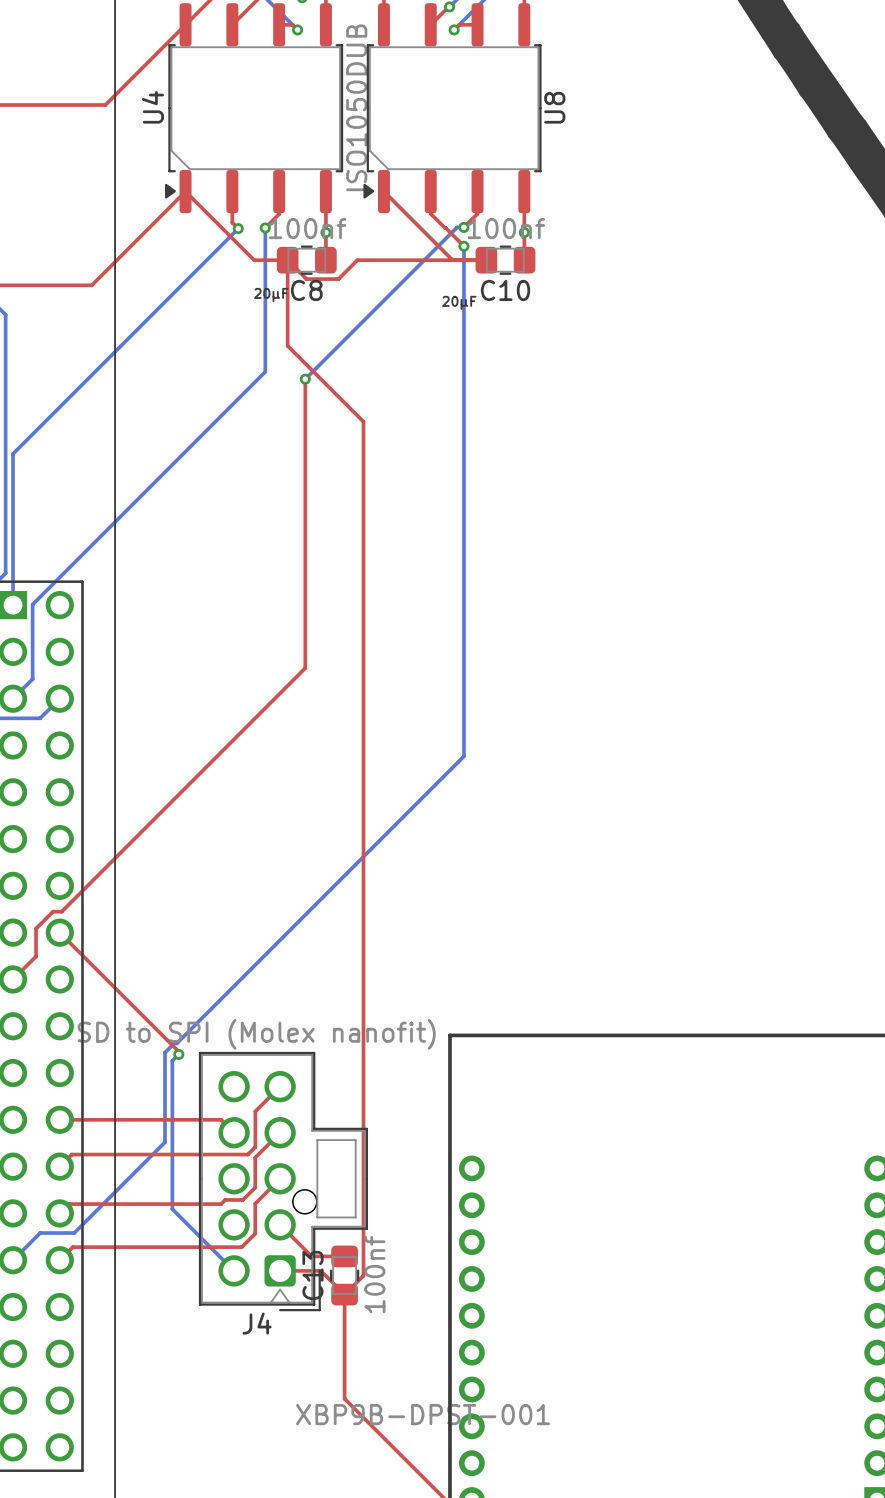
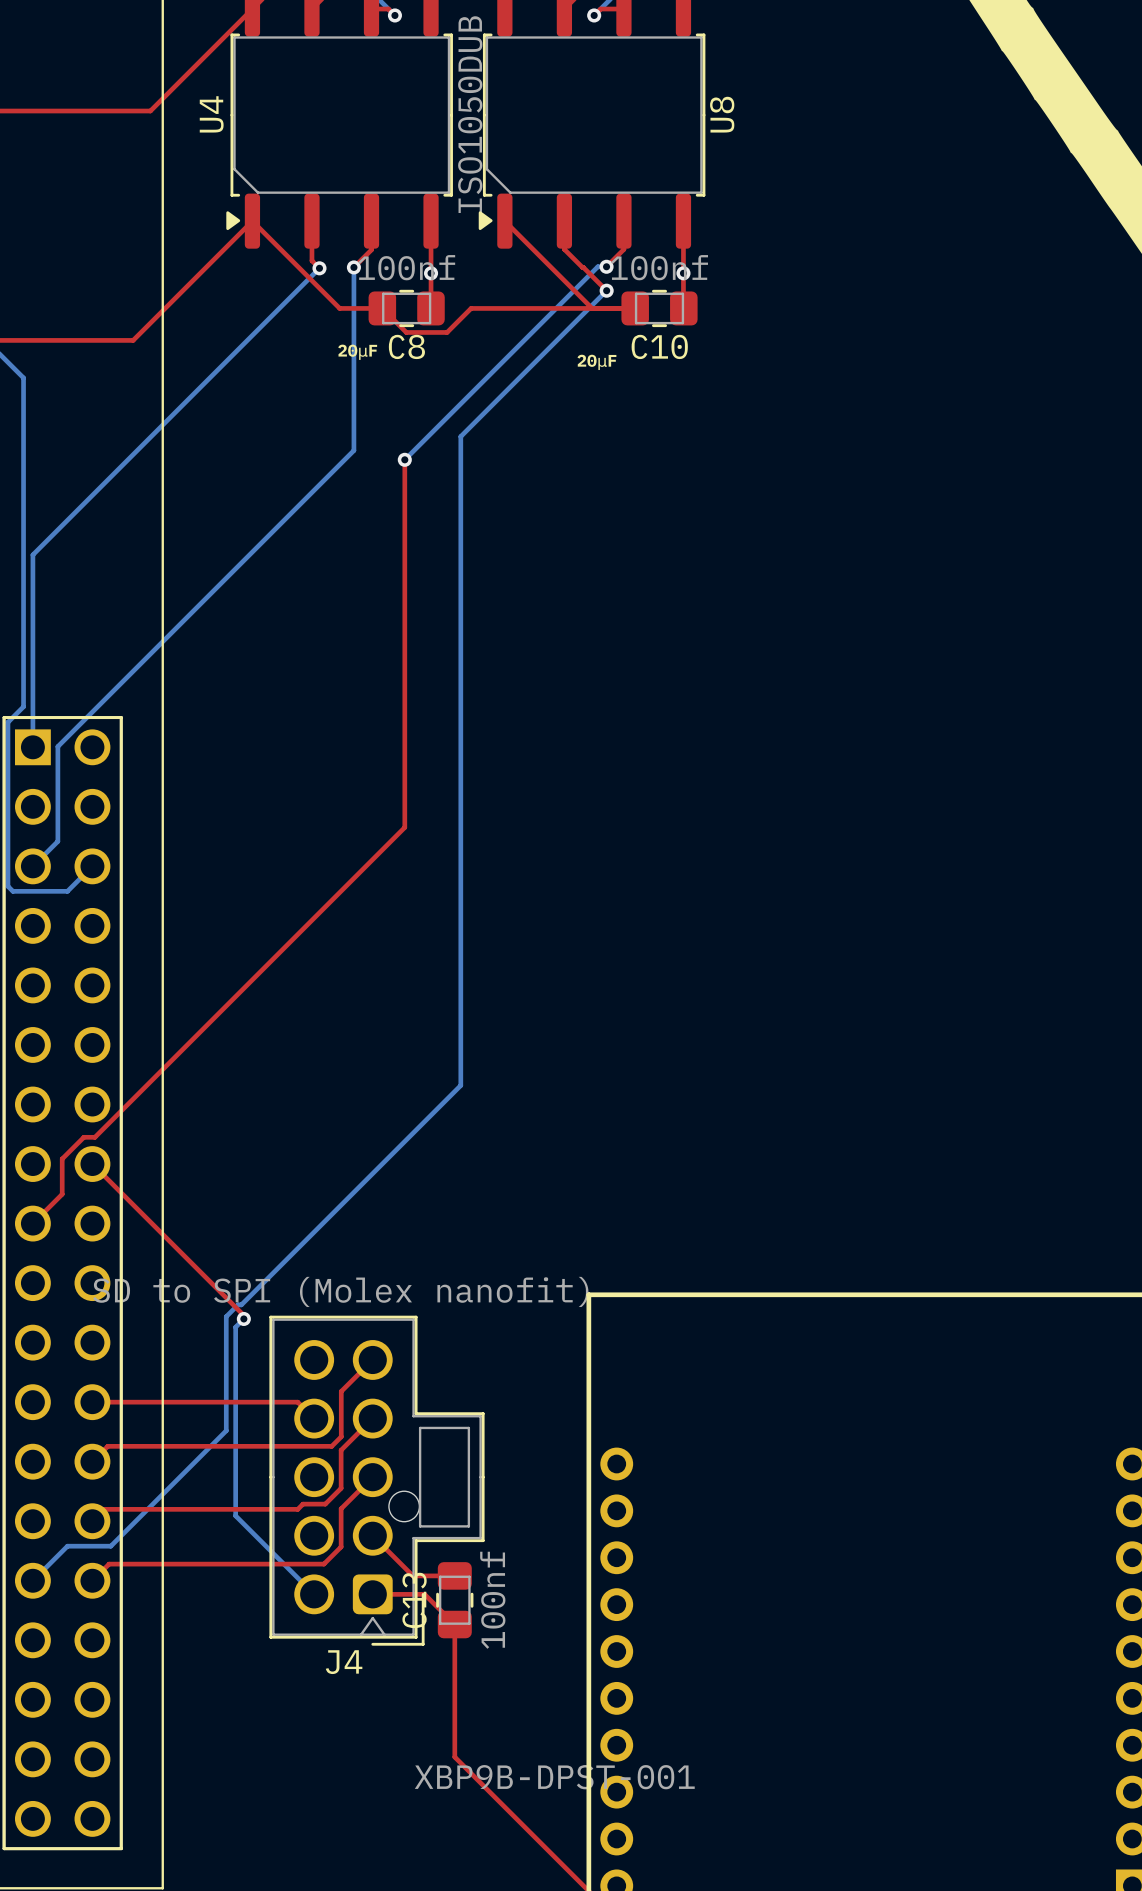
bottom track: (463, 246) (463, 756) (349, 870) -> (606, 290) (460, 436) (460, 1085)
top track: (287, 260) (287, 345) (363, 421) (363, 1275) (344, 1294) -> none

